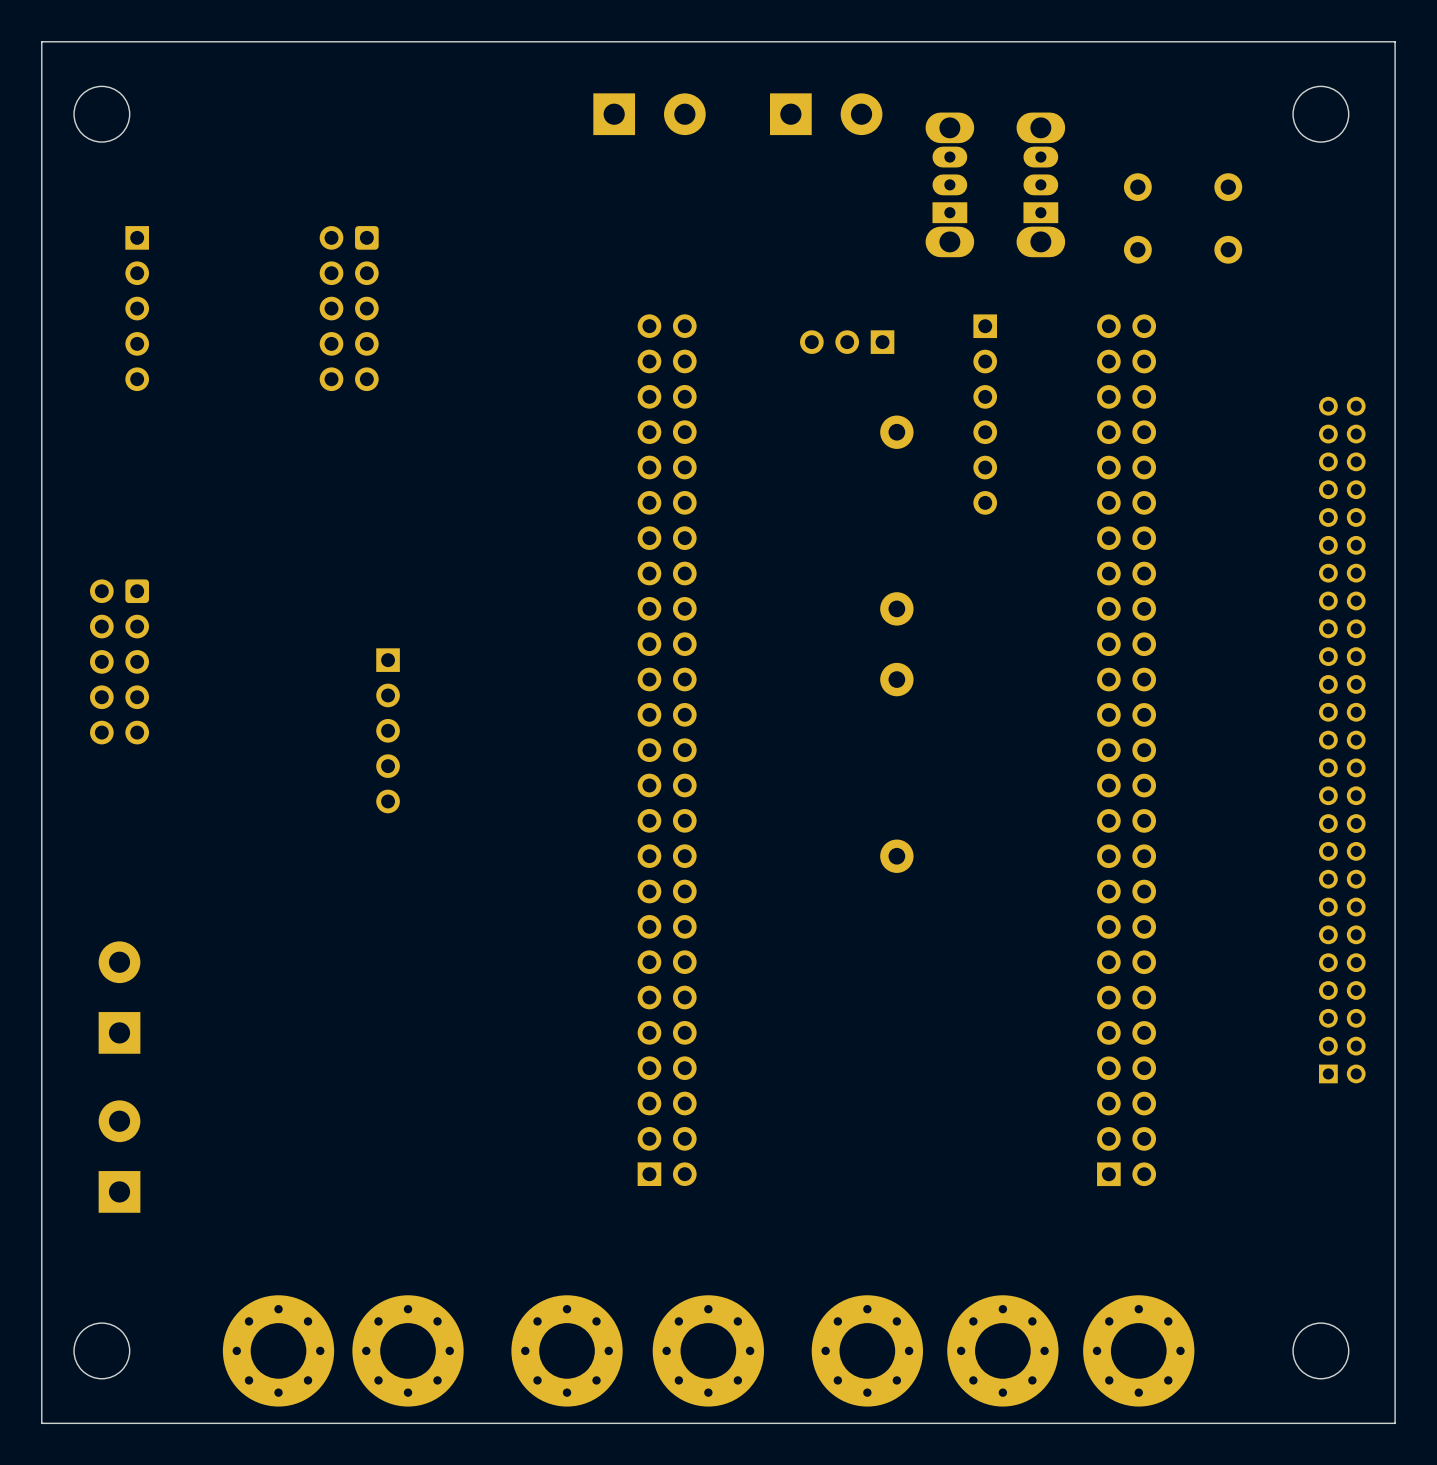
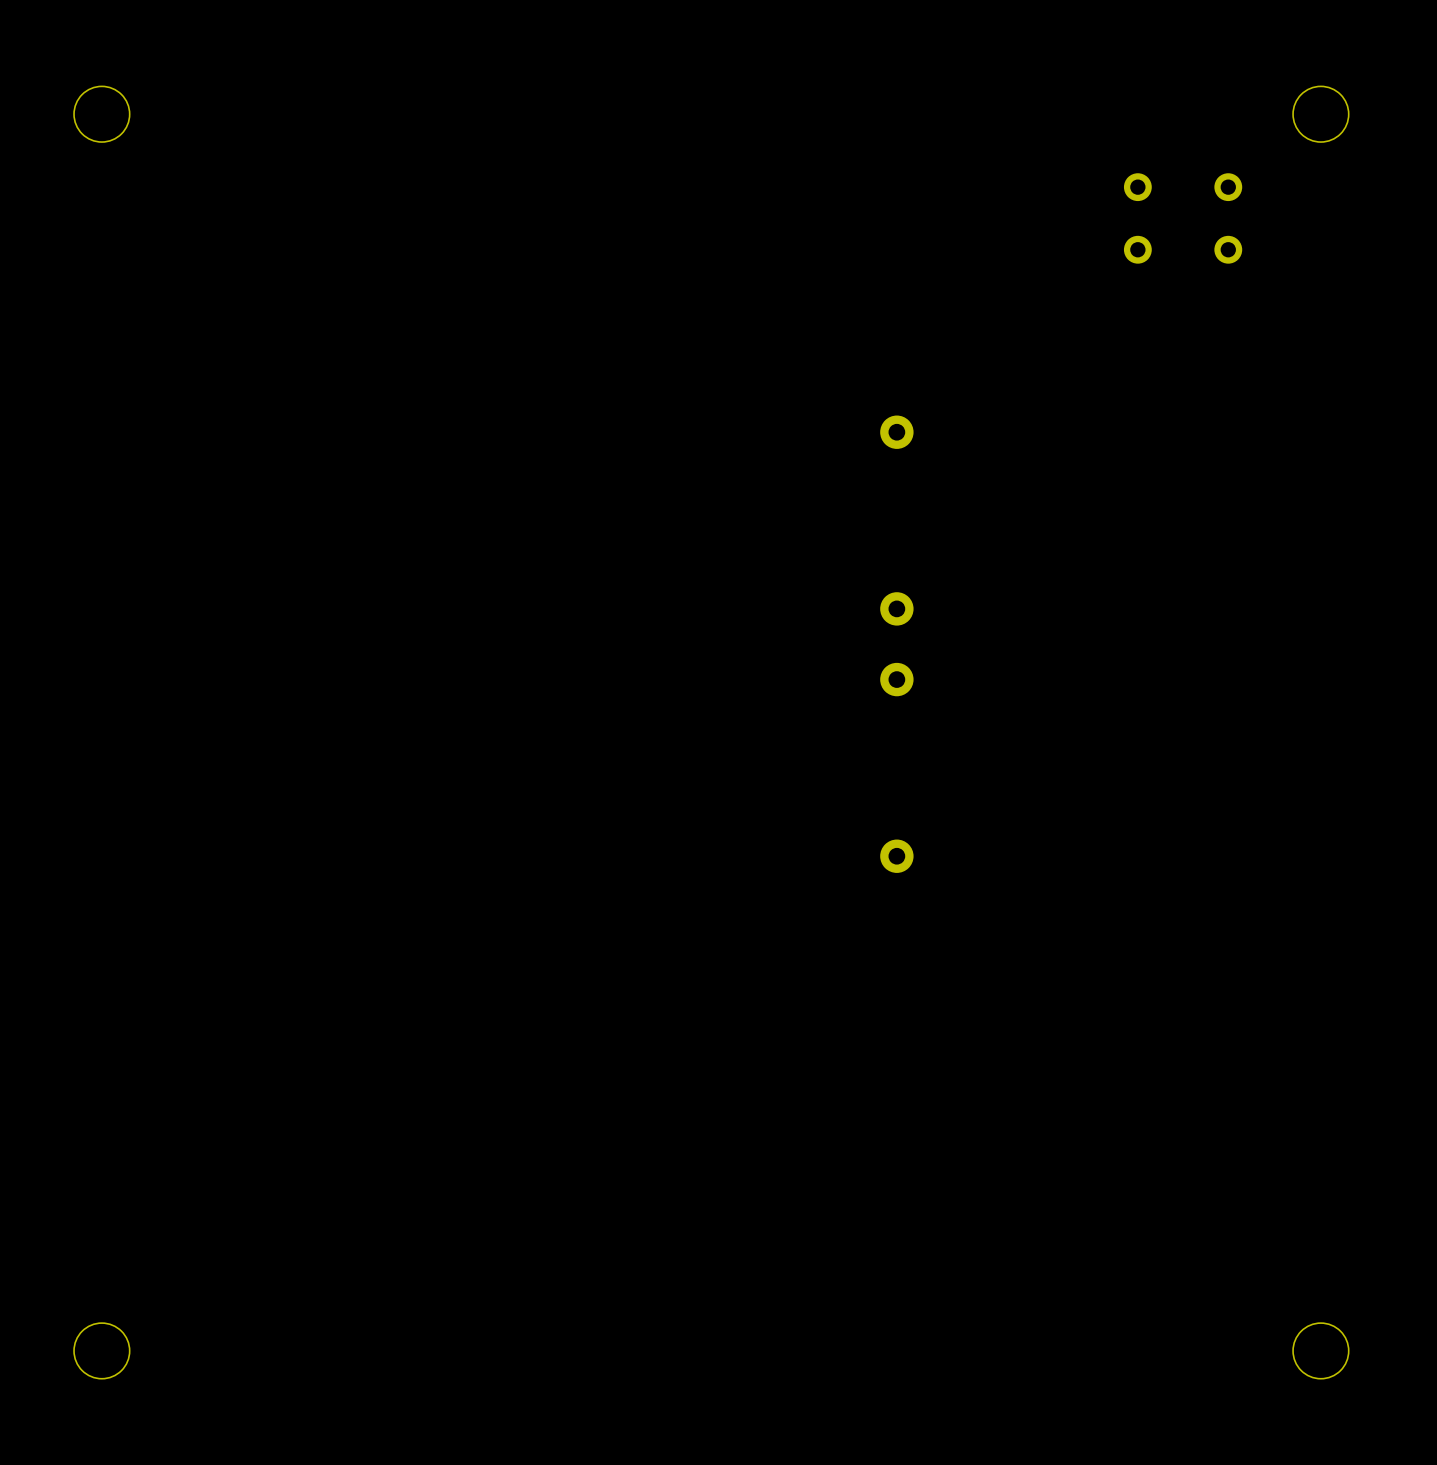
board edge: (1395, 41) (41, 41) (41, 1423) (1395, 1423) (1395, 41) -> none
part: (649, 114) -> none
part: (826, 114) -> none
part: (949, 184) -> none
part: (1040, 184) -> none
part: (137, 308) -> none
part: (349, 308) -> none
part: (847, 342) -> none
part: (985, 414) -> none
part: (119, 661) -> none
part: (388, 730) -> none
part: (1342, 740) -> none
part: (667, 750) -> none
part: (1126, 750) -> none
part: (119, 997) -> none
part: (119, 1156) -> none
part: (278, 1350) -> none
part: (408, 1350) -> none
part: (567, 1350) -> none
part: (708, 1350) -> none
part: (867, 1350) -> none
part: (1002, 1350) -> none
part: (1138, 1350) -> none

